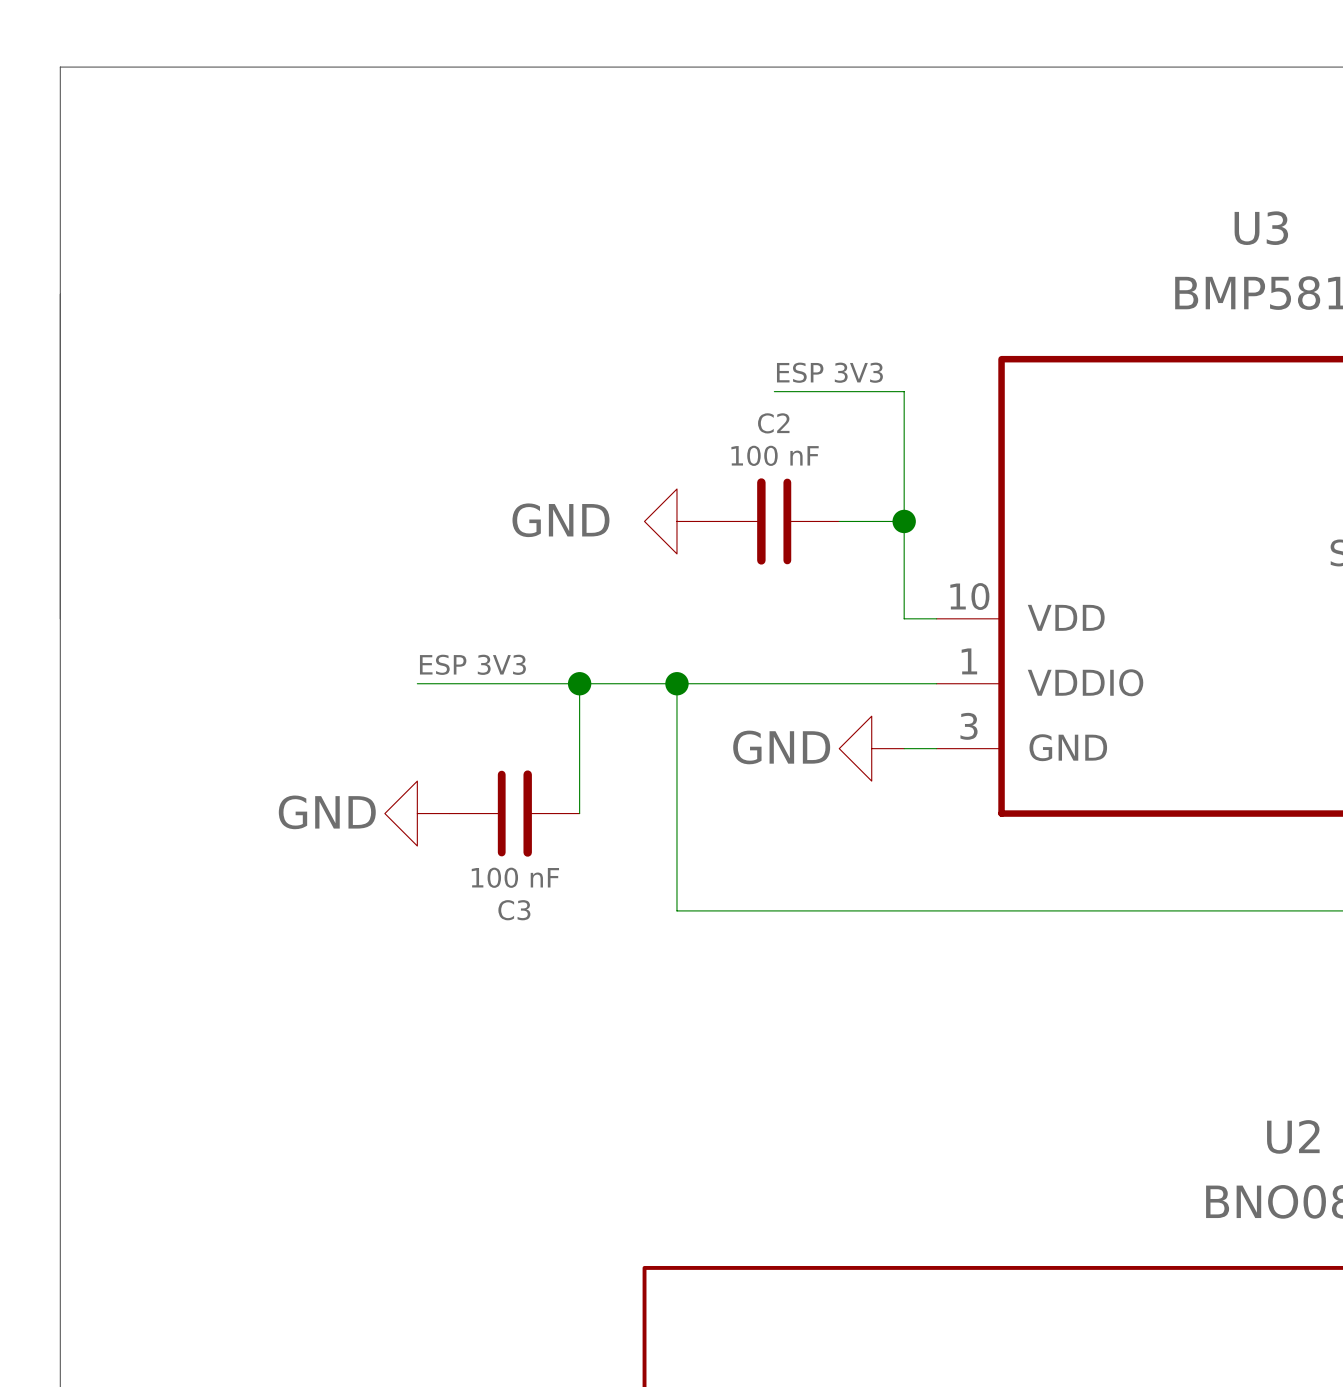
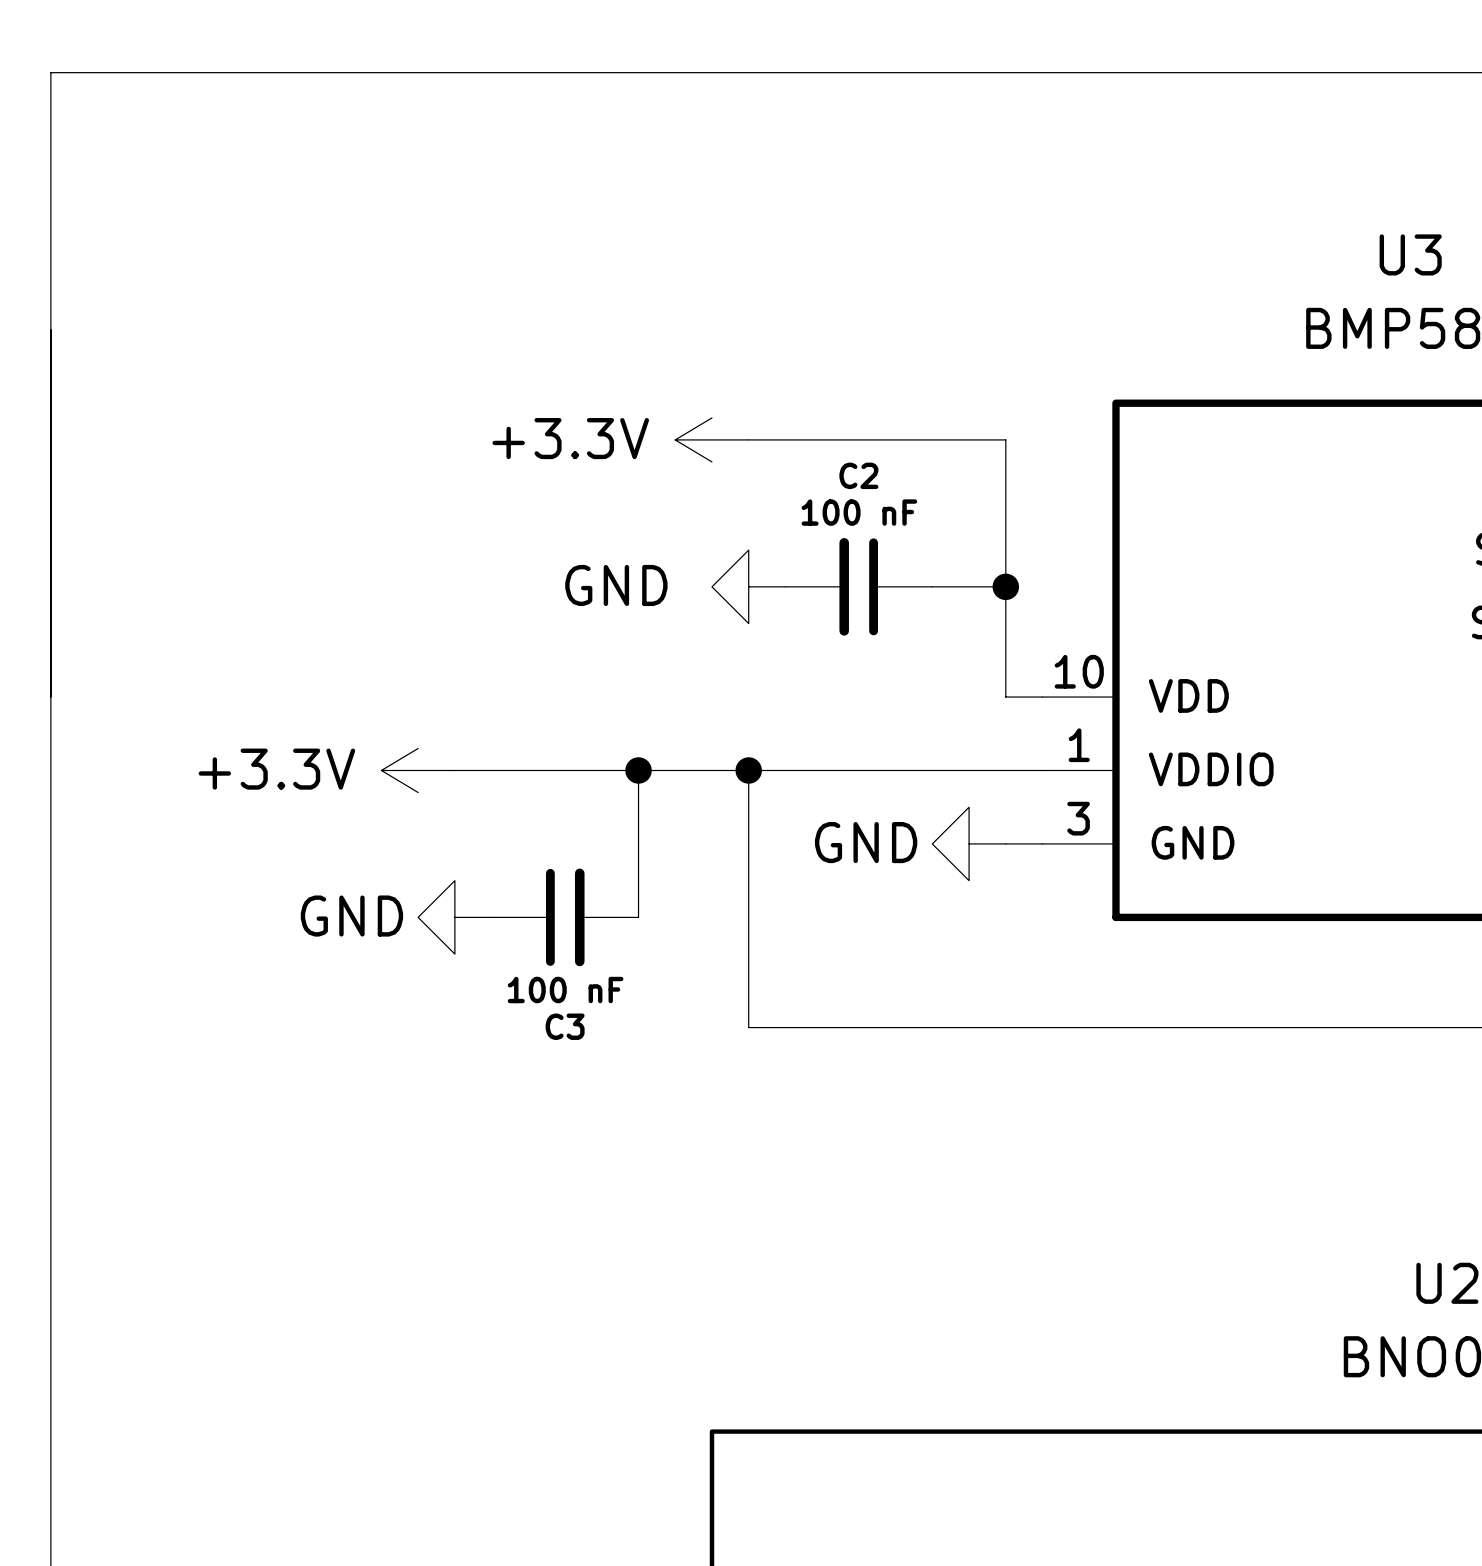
label: ESP 3V3 (829, 372) -> none
power symbol: none -> +3.3V (711, 439)
wire: none -> (748, 439) (858, 439)
label: ESP 3V3 (472, 664) -> none
power symbol: none -> +3.3V (418, 770)

